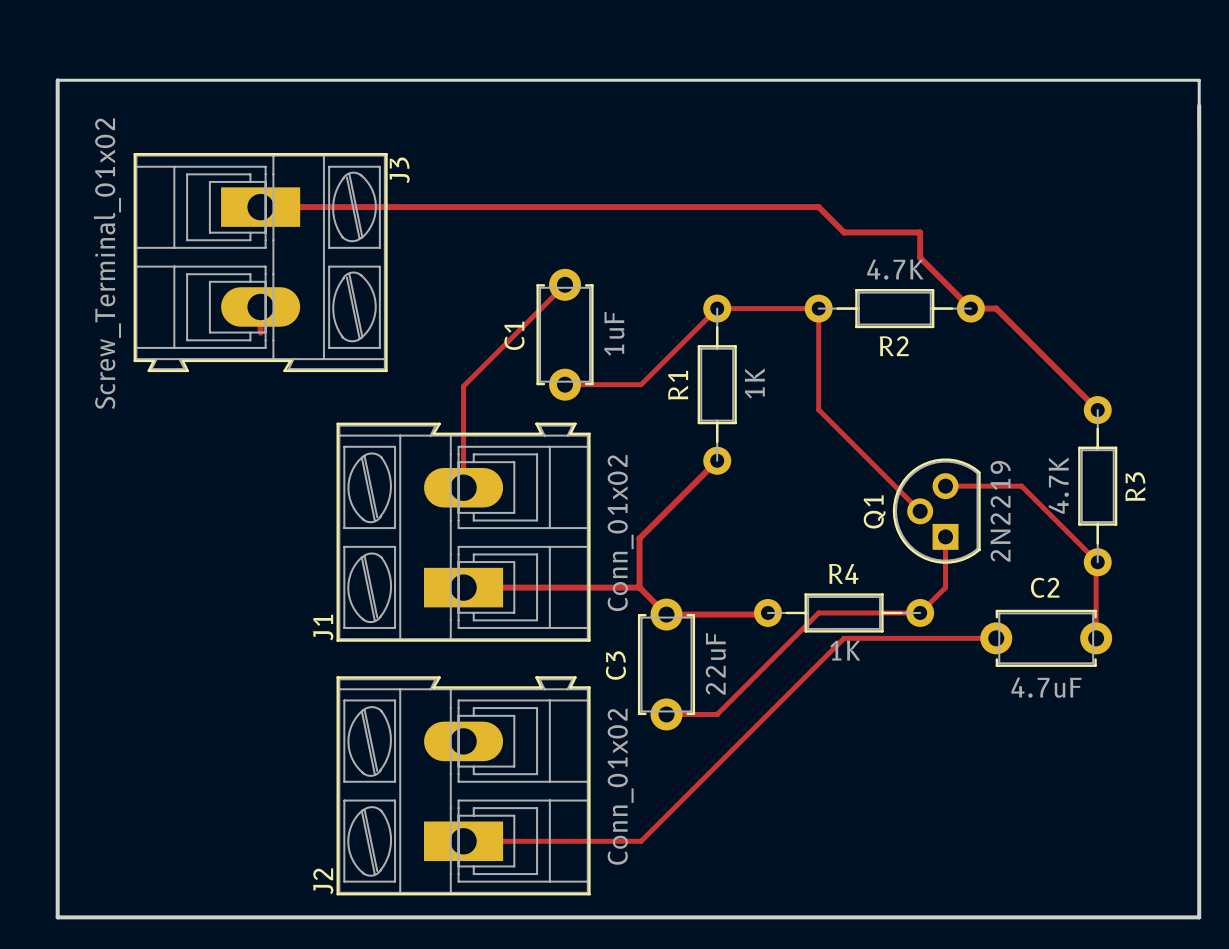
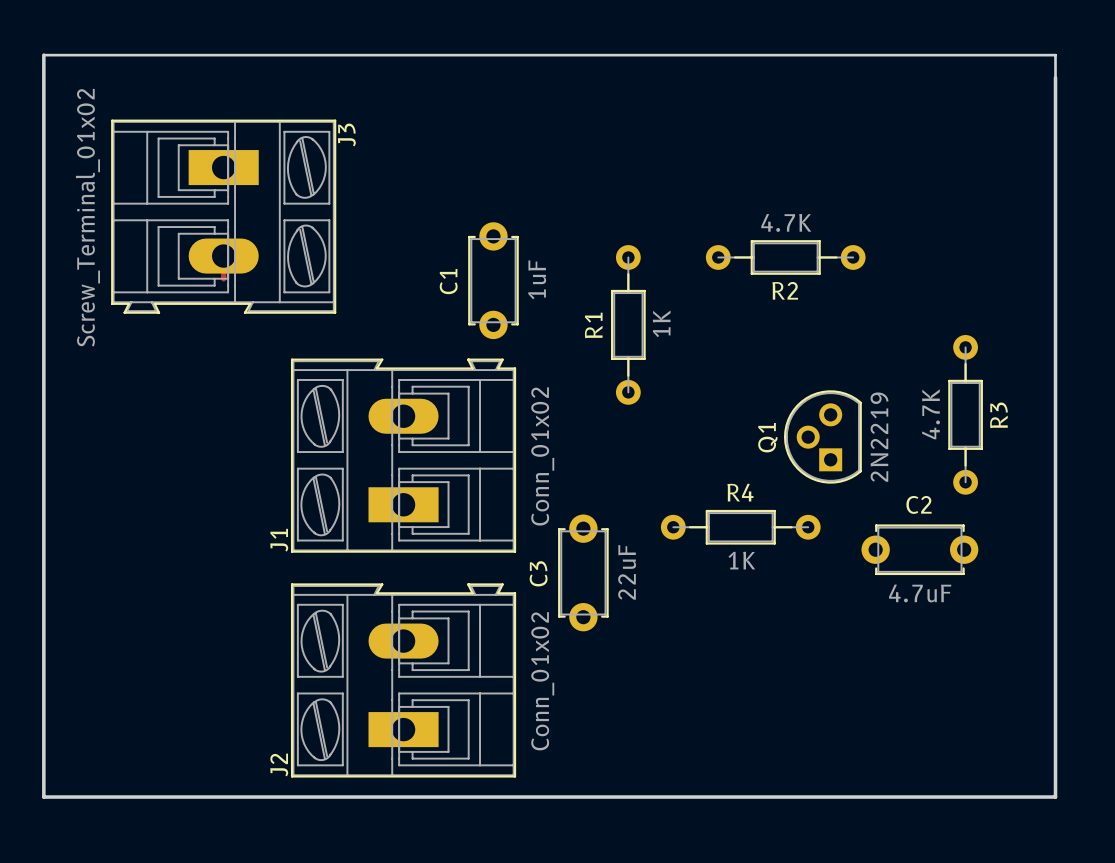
track: (260, 207) (818, 207) (844, 232) (920, 232) (920, 257) (970, 308) (996, 308) (1097, 410) -> none
track: (565, 284) (463, 386) (463, 487) -> none
track: (565, 384) (641, 384) (717, 308) (818, 308) (818, 409) (920, 511) -> none
track: (717, 460) (639, 538) (639, 587) -> none
track: (945, 486) (1021, 486) (1097, 562) (1096, 563) (1096, 638) -> none
track: (945, 536) (945, 587) (920, 612) (818, 612) (717, 714) (666, 714) -> none
track: (443, 587) (639, 587) -> none
track: (639, 587) (666, 614) (766, 614) (767, 612) -> none
track: (996, 638) (844, 638) (641, 841) (463, 841) -> none

